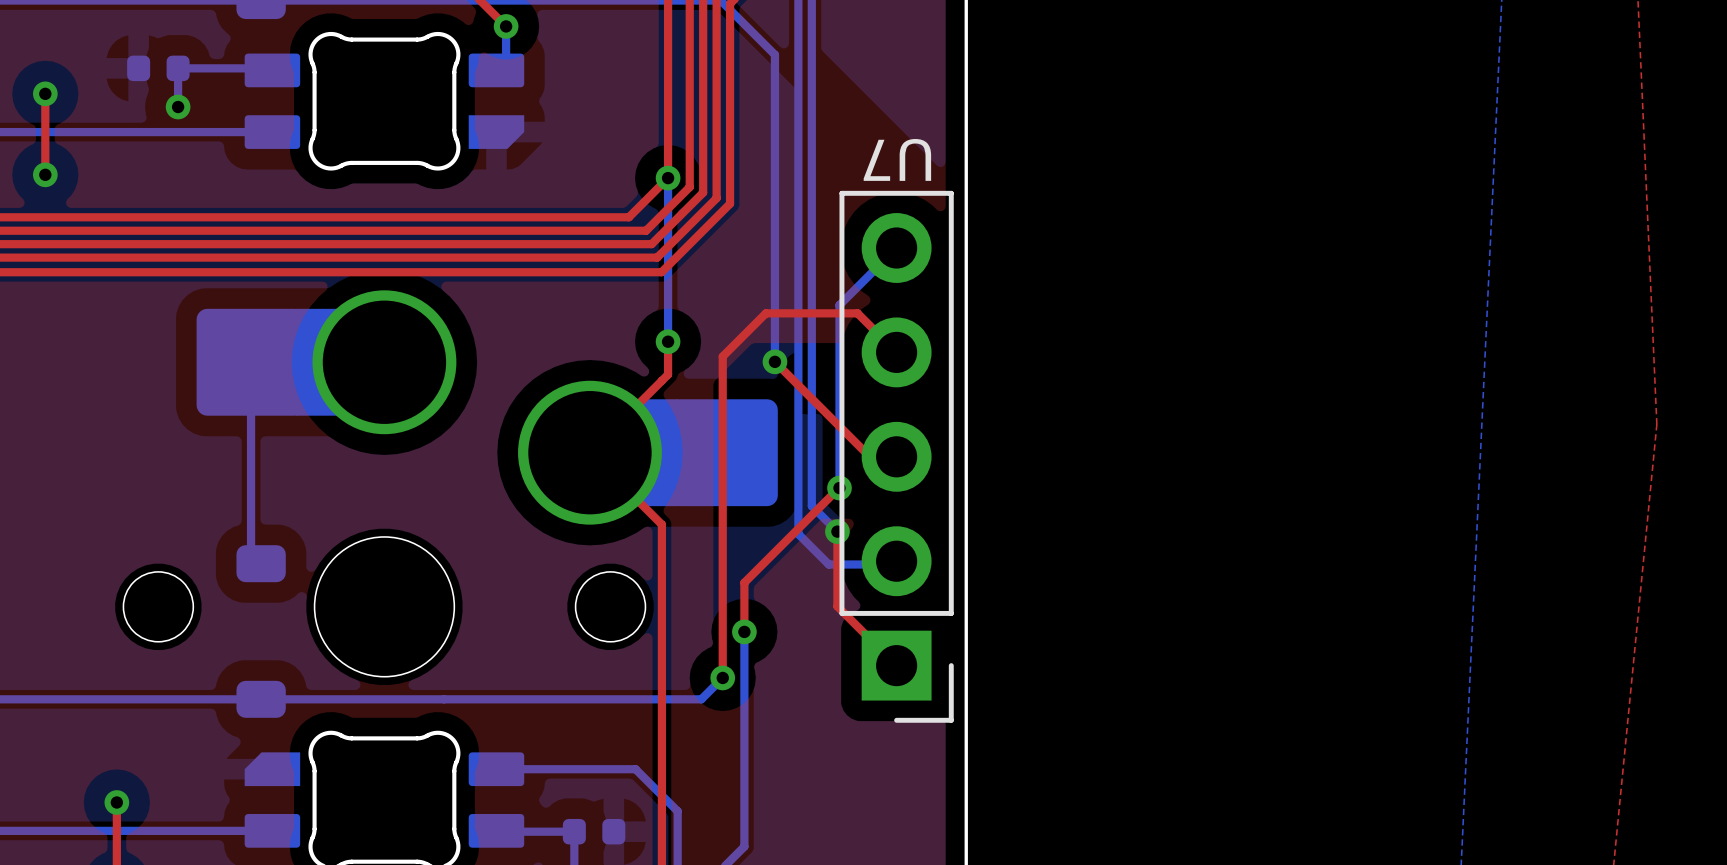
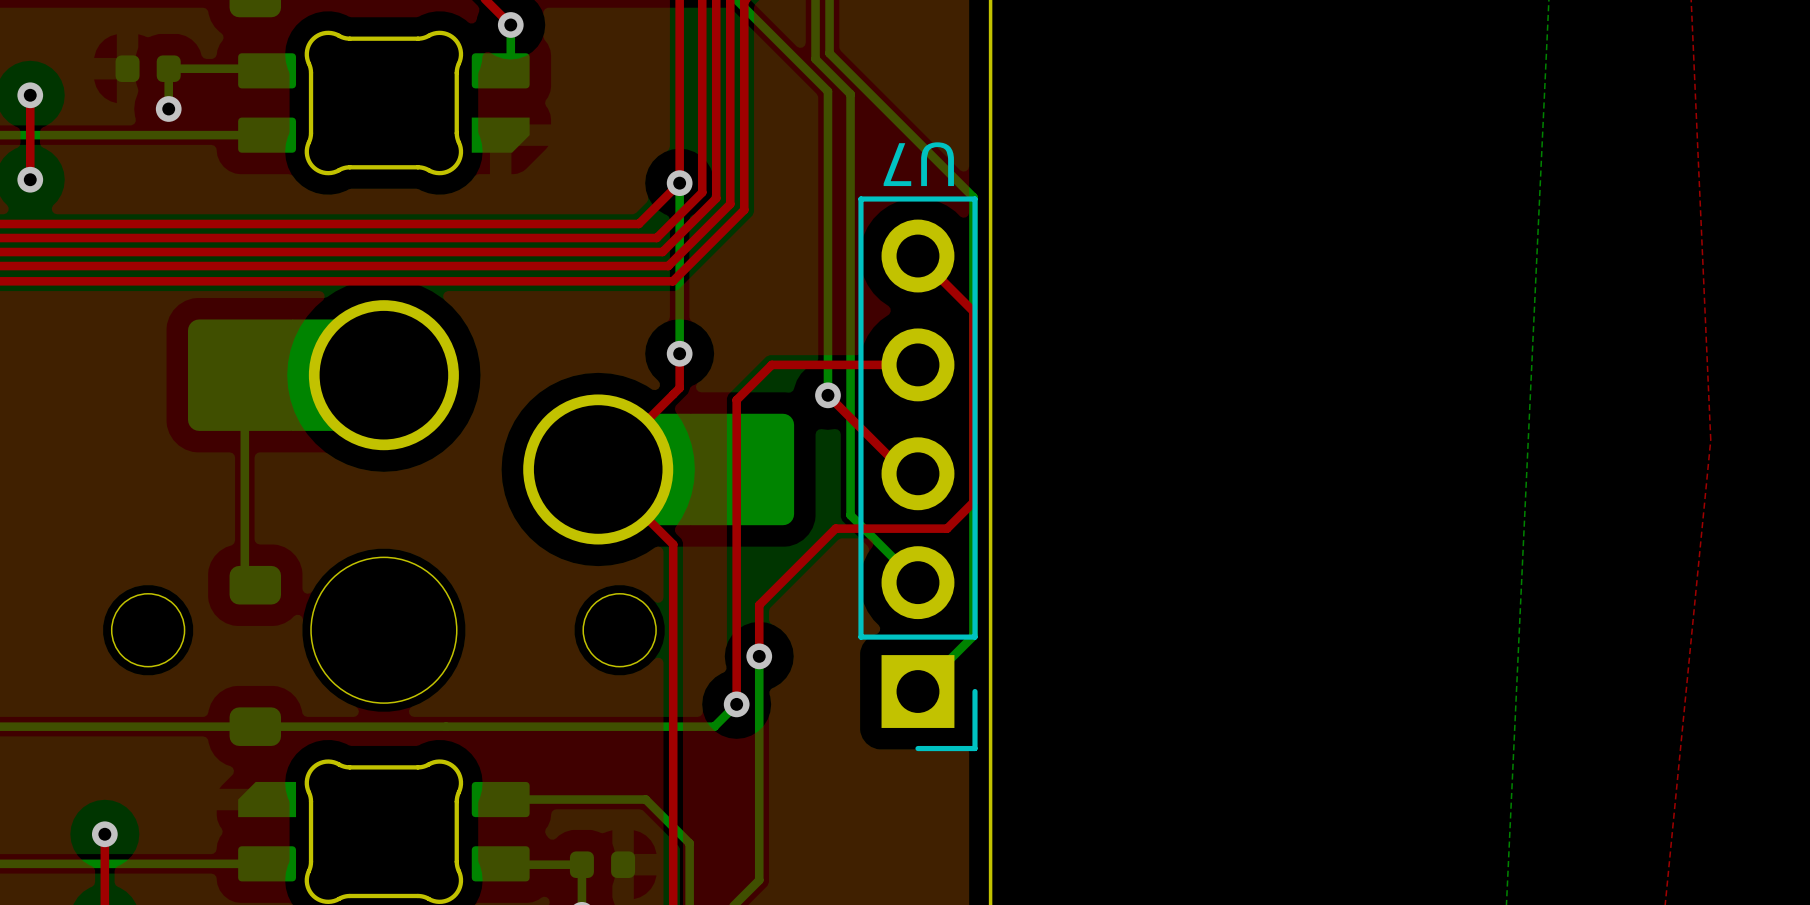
bottom track: (811, 53) (811, 506) (837, 531) -> (829, 53) (973, 197) (973, 636) (917, 691)
bottom track: (774, 54) (774, 361) -> (791, 54) (827, 91) (827, 395)
bottom track: (798, 59) (798, 534) (828, 564) (893, 564) (896, 561) -> (815, 59) (850, 94) (850, 515) (917, 582)
bottom track: (896, 247) (839, 305) (839, 488) -> none
top track: (896, 352) (857, 313) (765, 313) (722, 356) (722, 386) -> (917, 364) (771, 364) (736, 400)
top track: (774, 361) (869, 456) (885, 456) -> (827, 395) (906, 473)
via position: (774, 361) -> (827, 395)
top track: (839, 488) (817, 509) -> (917, 256) (973, 311) (973, 502) (947, 528) (835, 528)
via: (839, 488) -> none
top track: (837, 531) (837, 606) (896, 665) -> none
via: (837, 531) -> none

